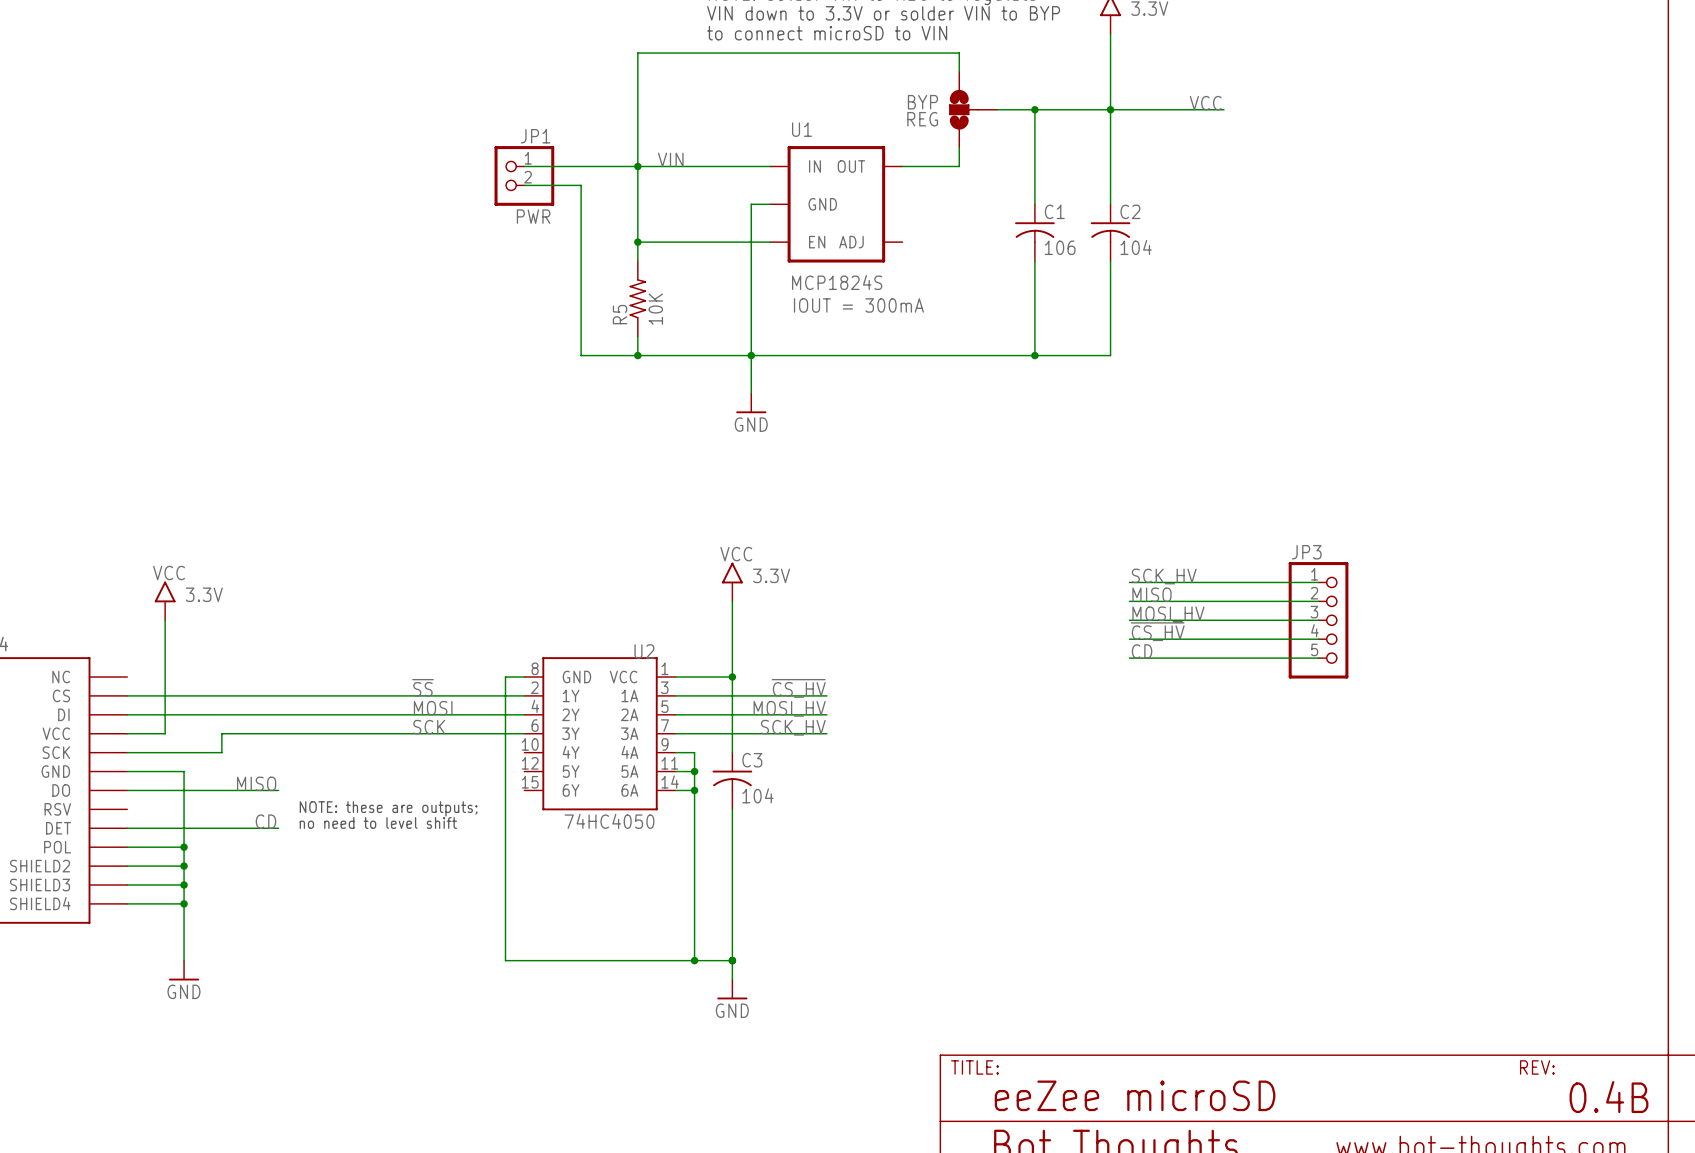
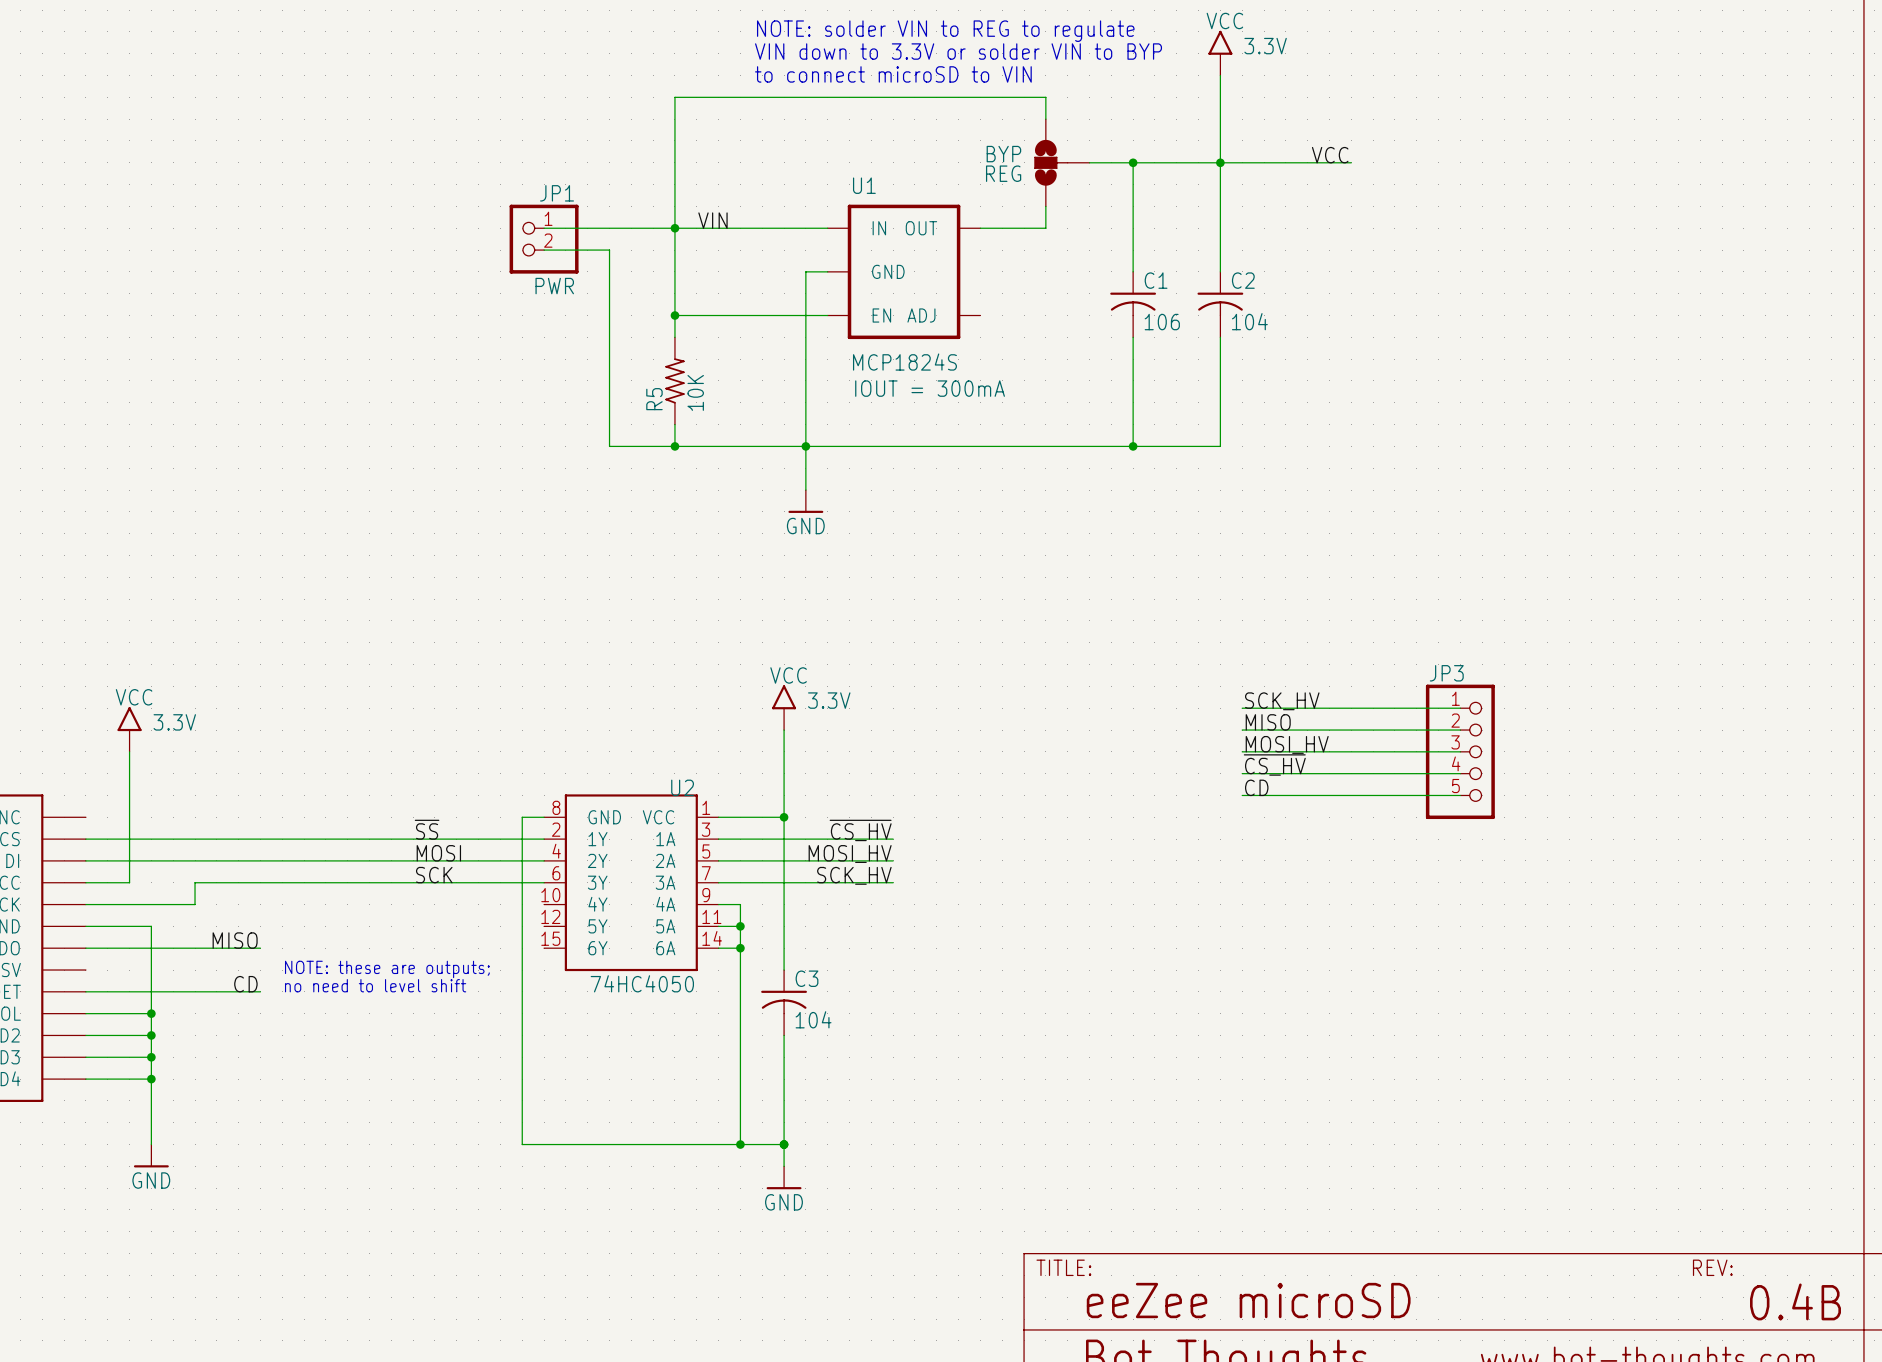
C3 position: (732, 781) -> (784, 1002)

